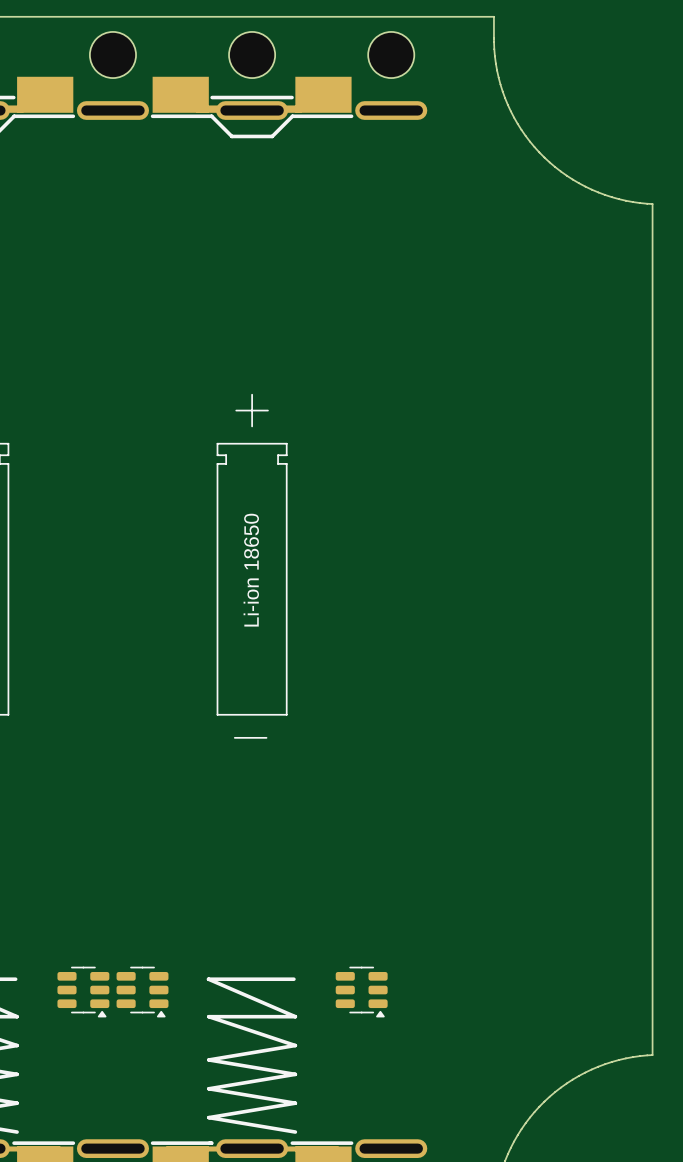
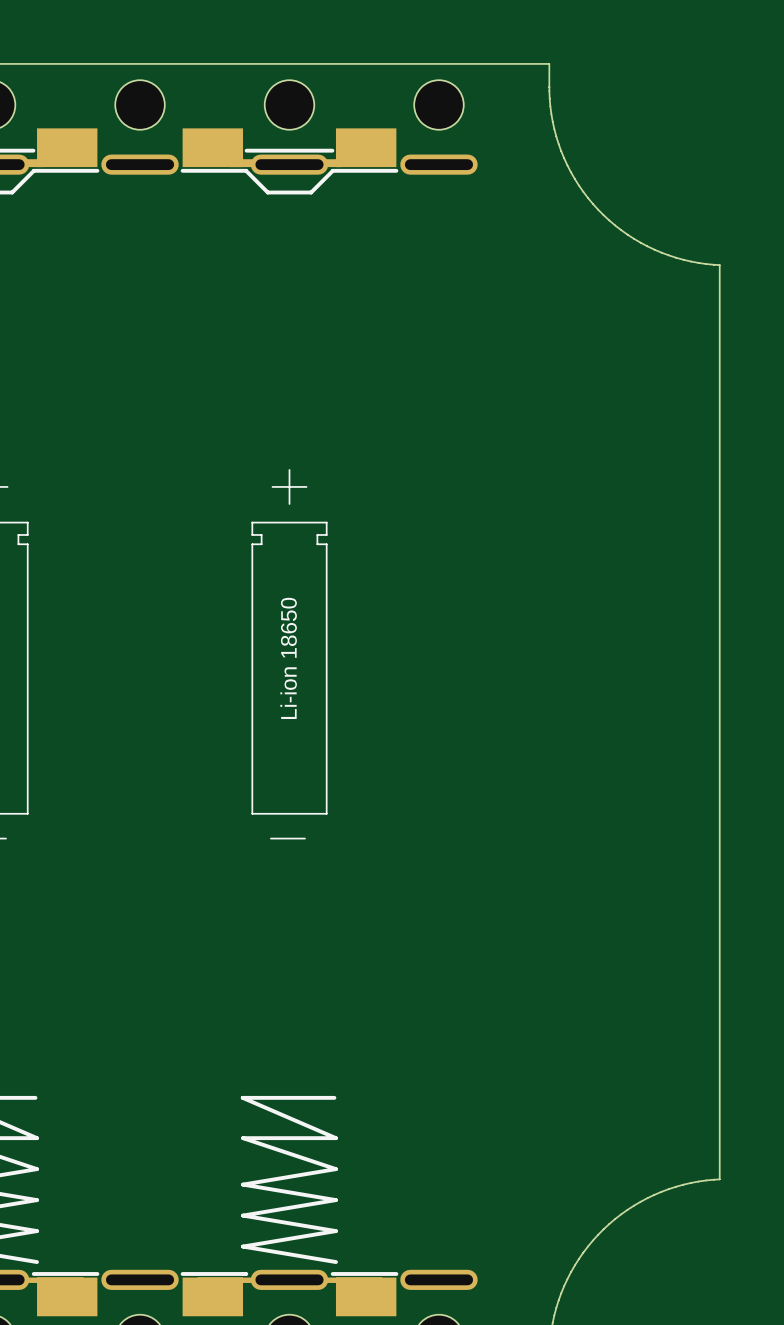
part: (83, 992) -> none
part: (142, 992) -> none
part: (361, 992) -> none

